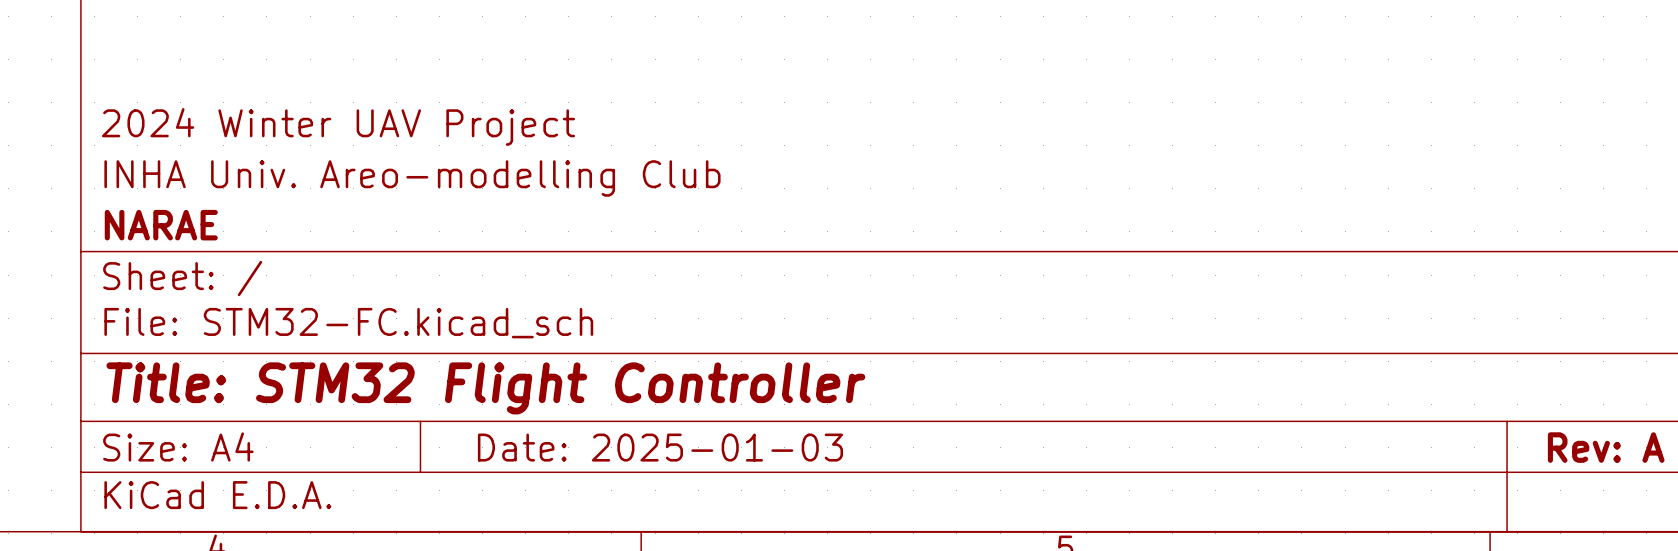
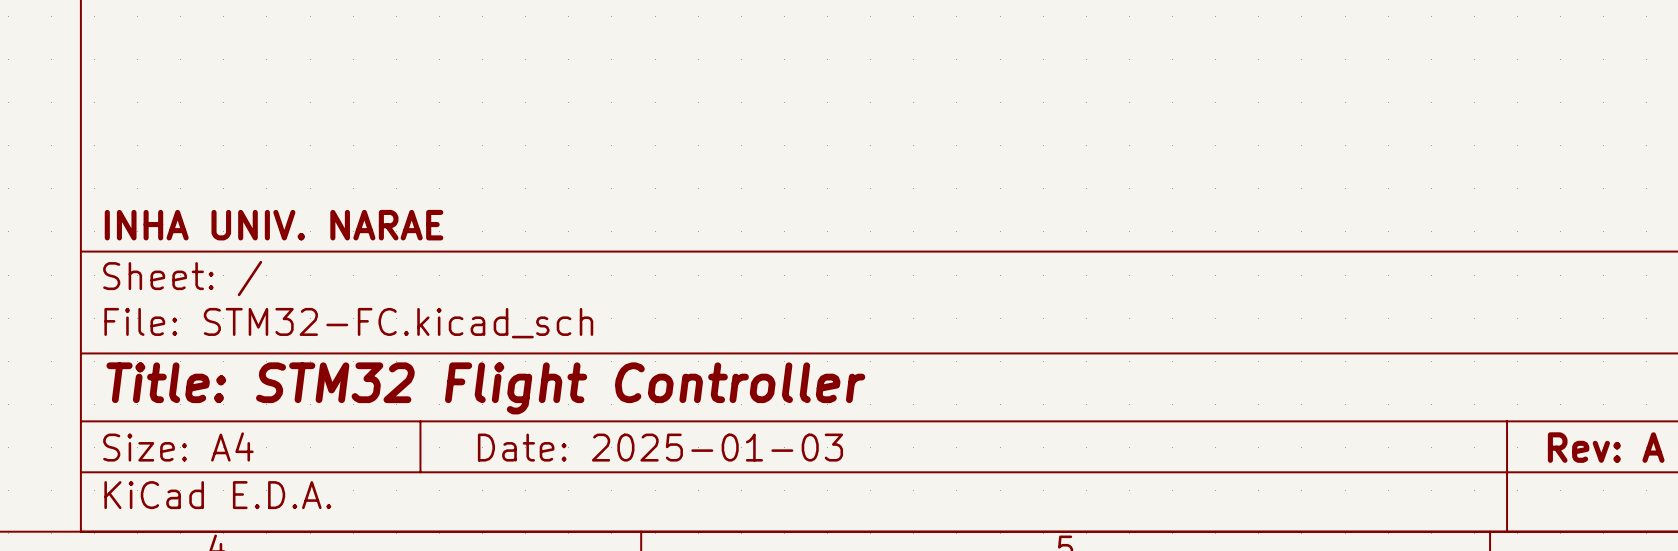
title block: 2024 Winter UAV Project (338, 126) -> none
title block: INHA Univ. Areo-modelling Club (412, 178) -> none
title block: NARAE (161, 225) -> INHA UNIV. NARAE (274, 225)

